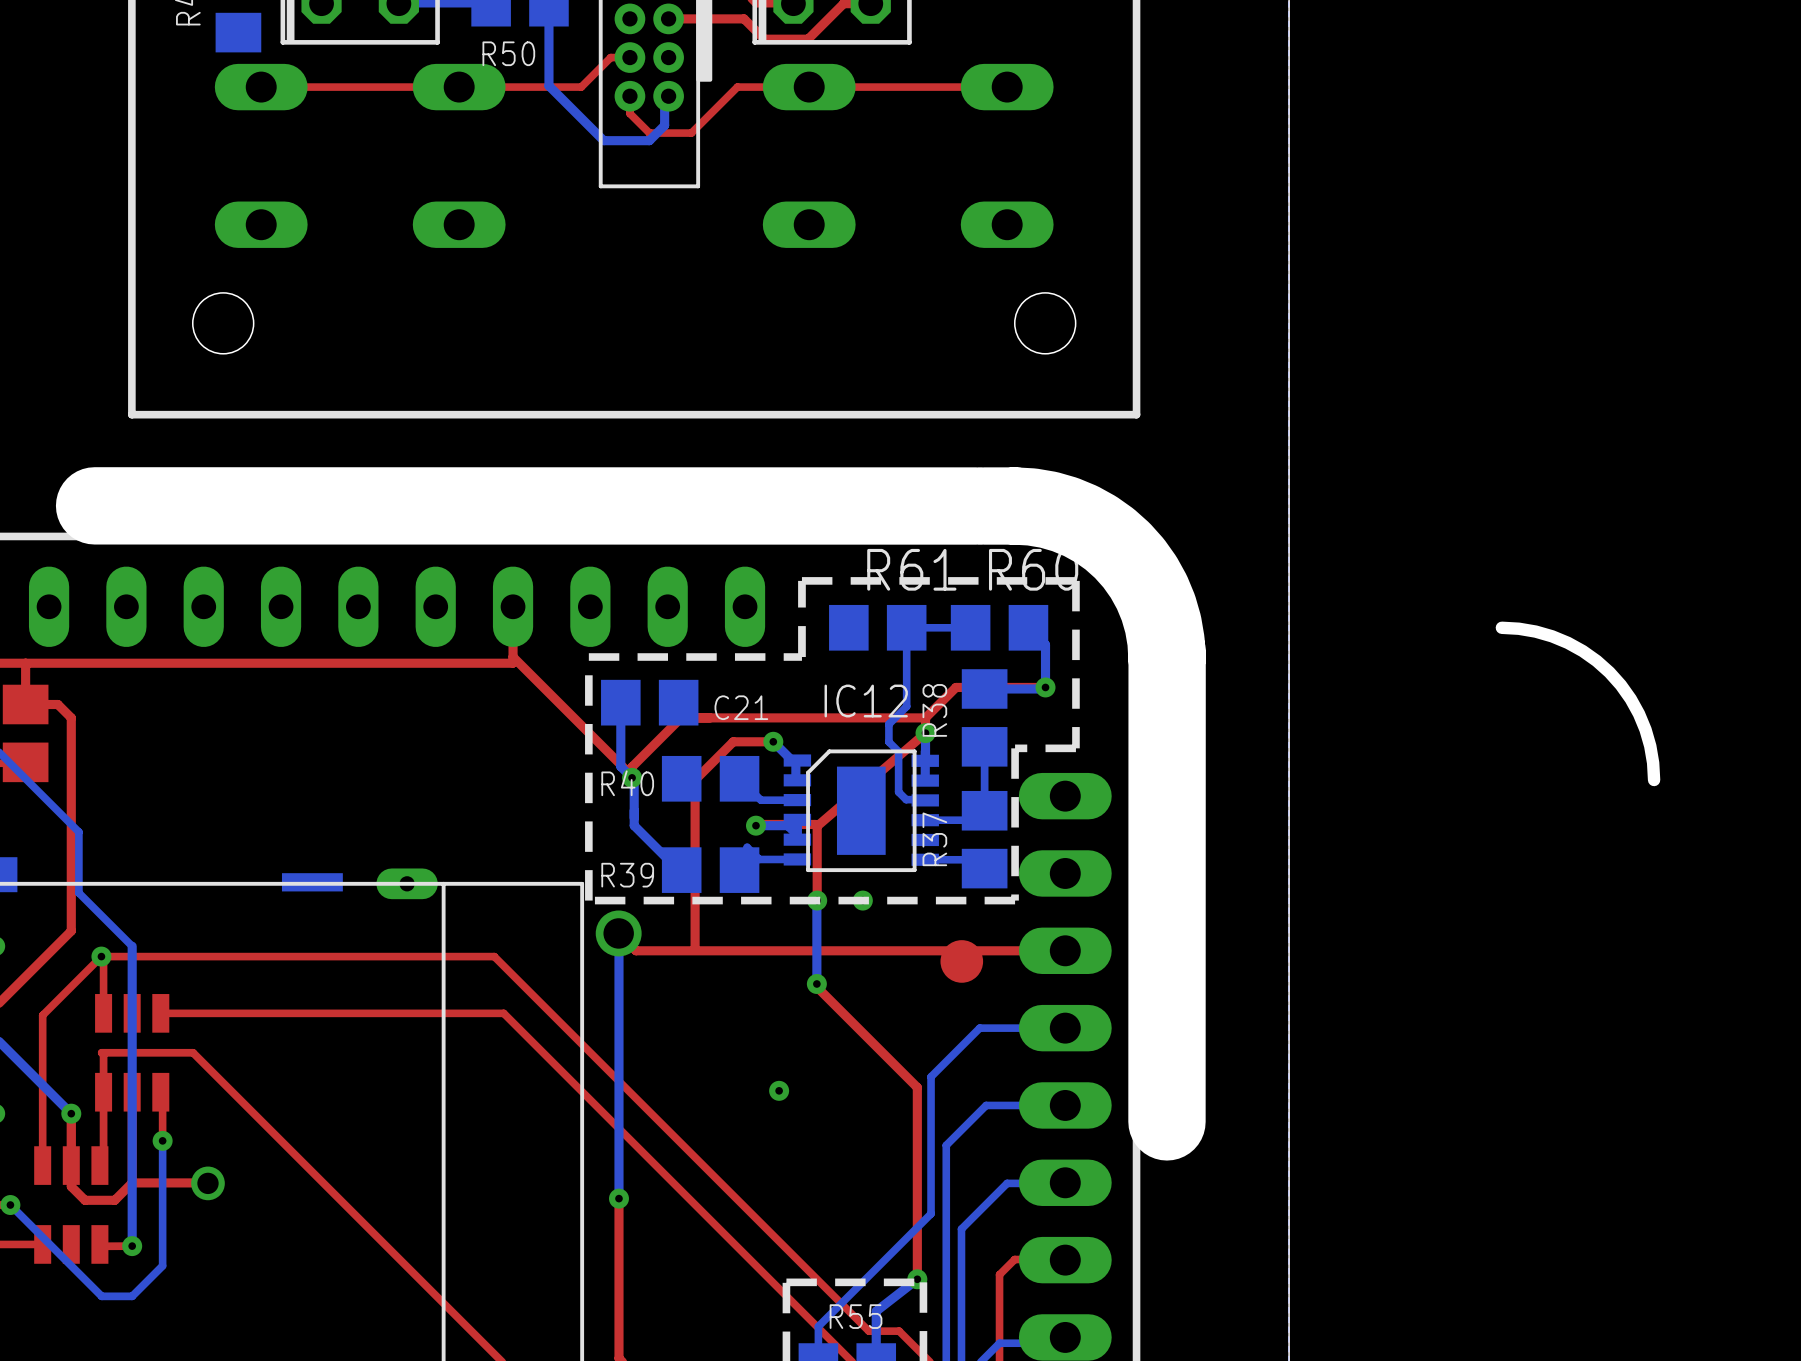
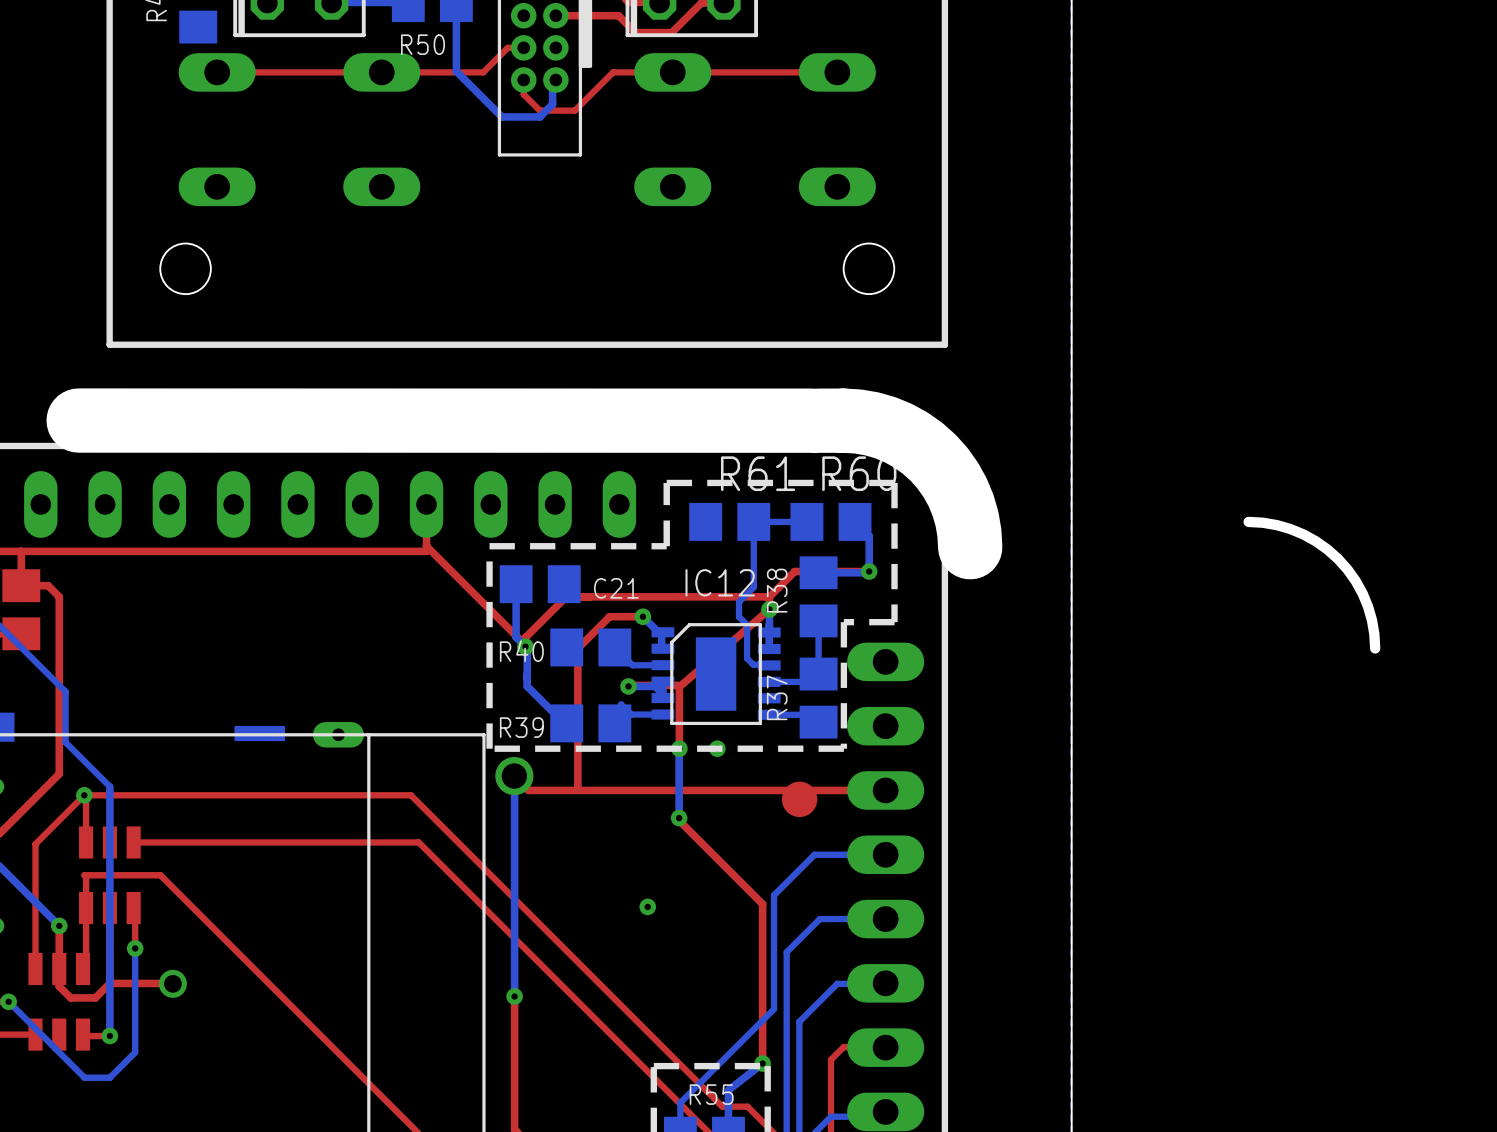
board edge: (1167, 651) (1166, 1121) -> none

